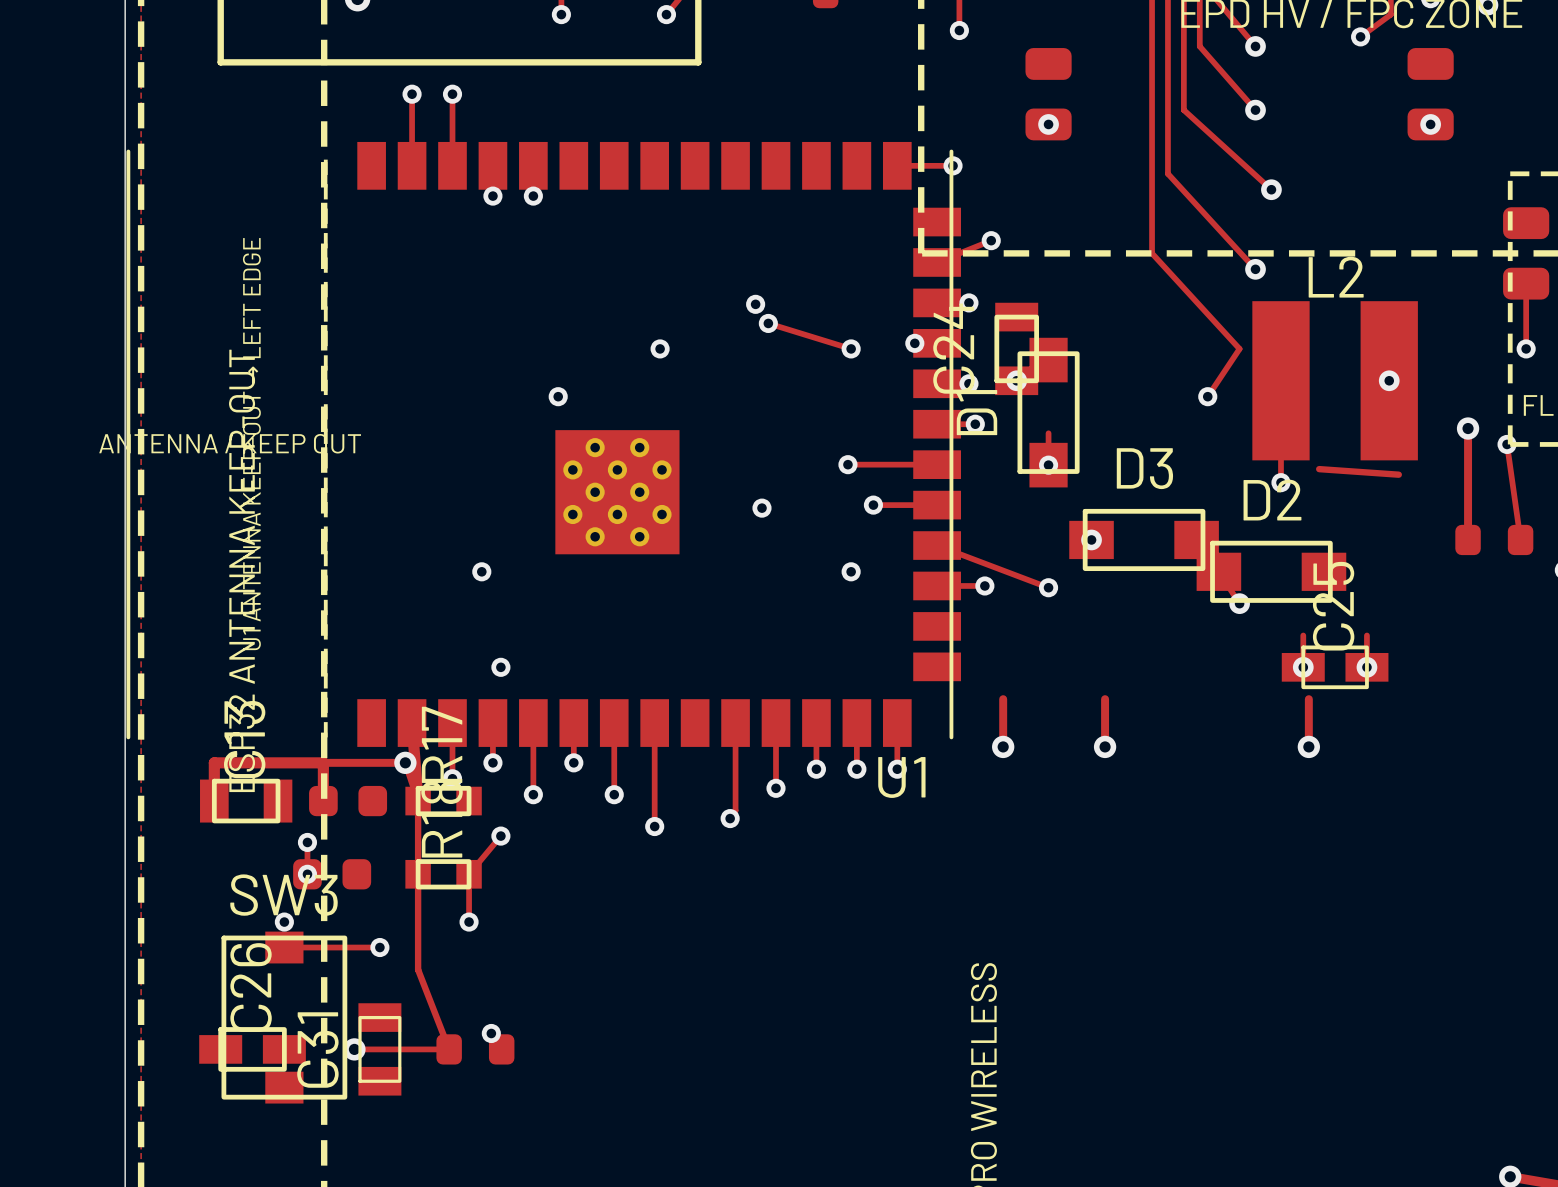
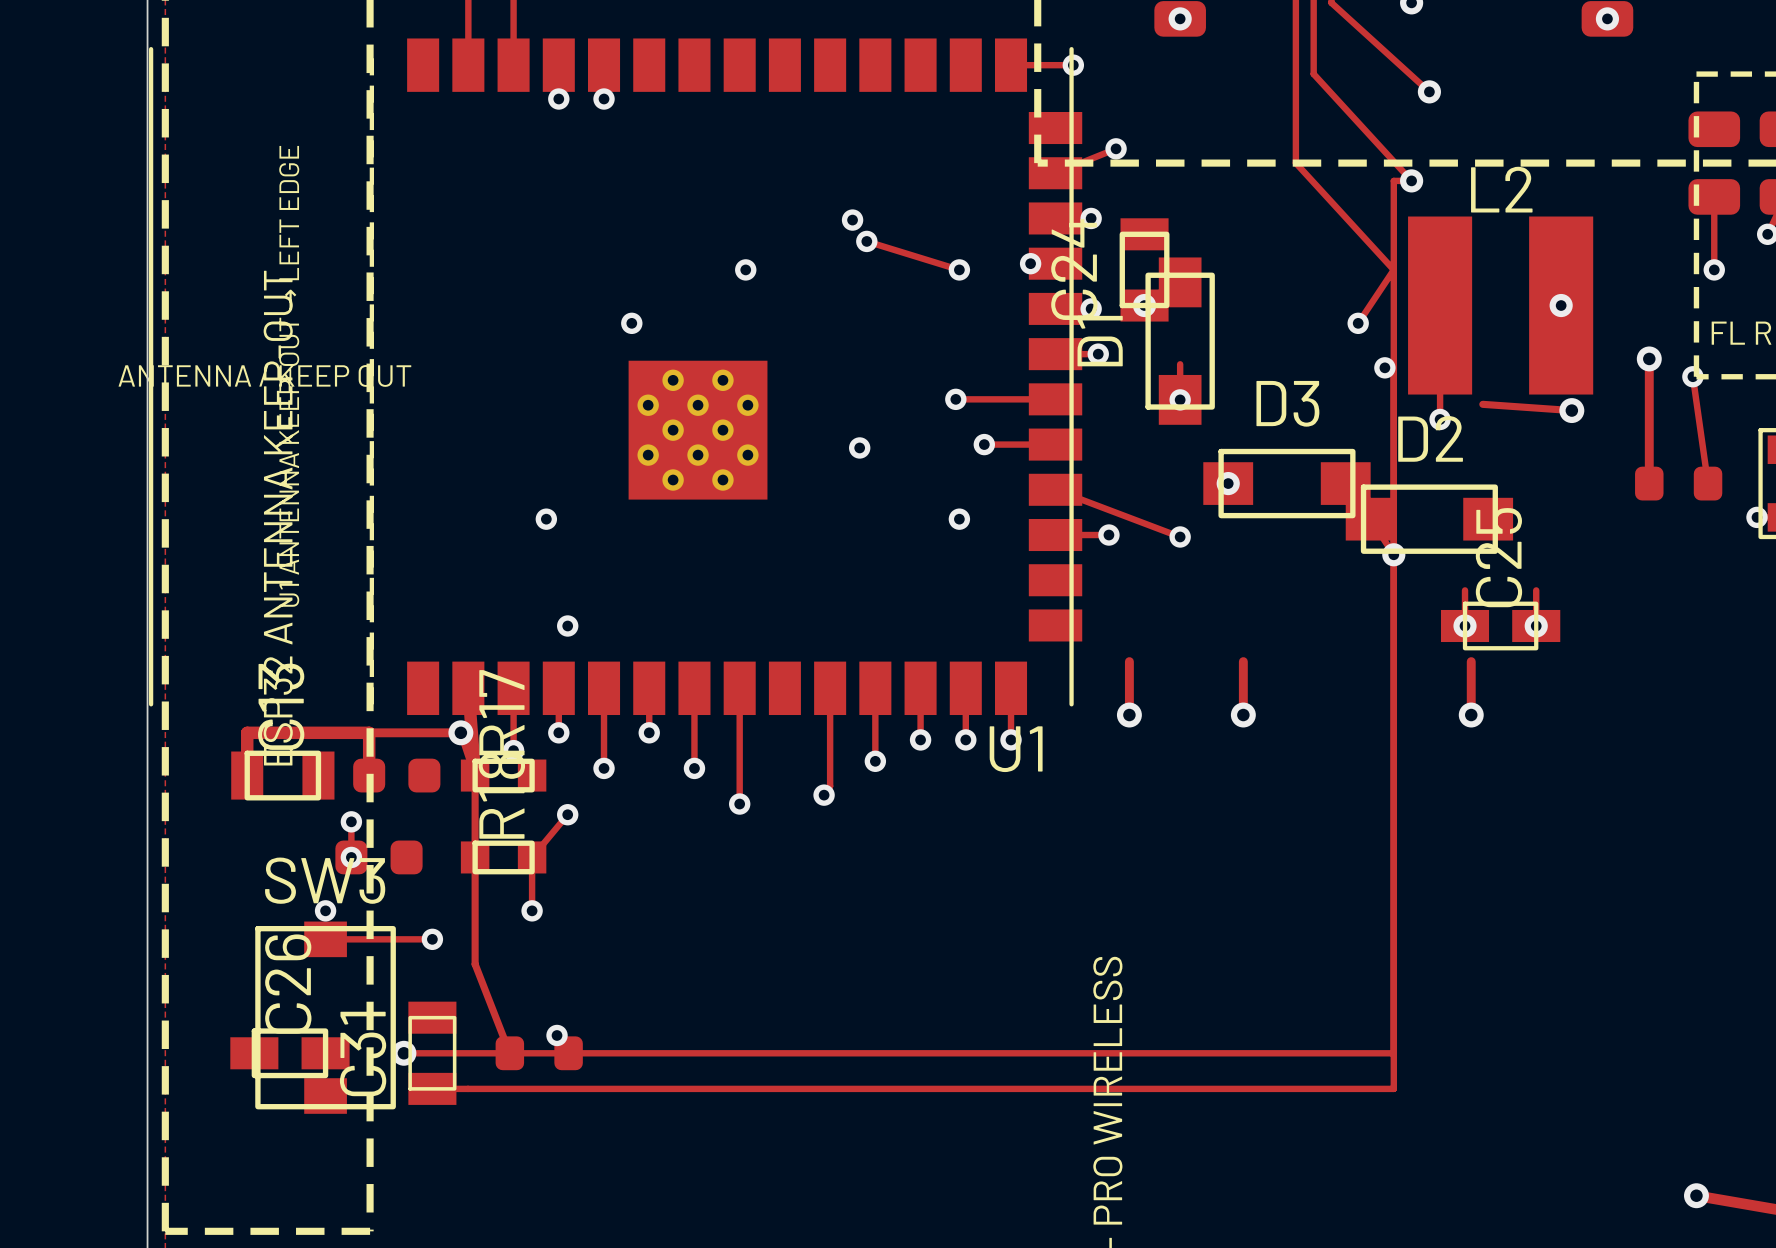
track: none -> (1411, 180) (1393, 180) (1393, 1088) (432, 1088)
via: none -> (1384, 367)
via: none -> (1571, 410)
track: none -> (509, 1053) (1393, 1053)

